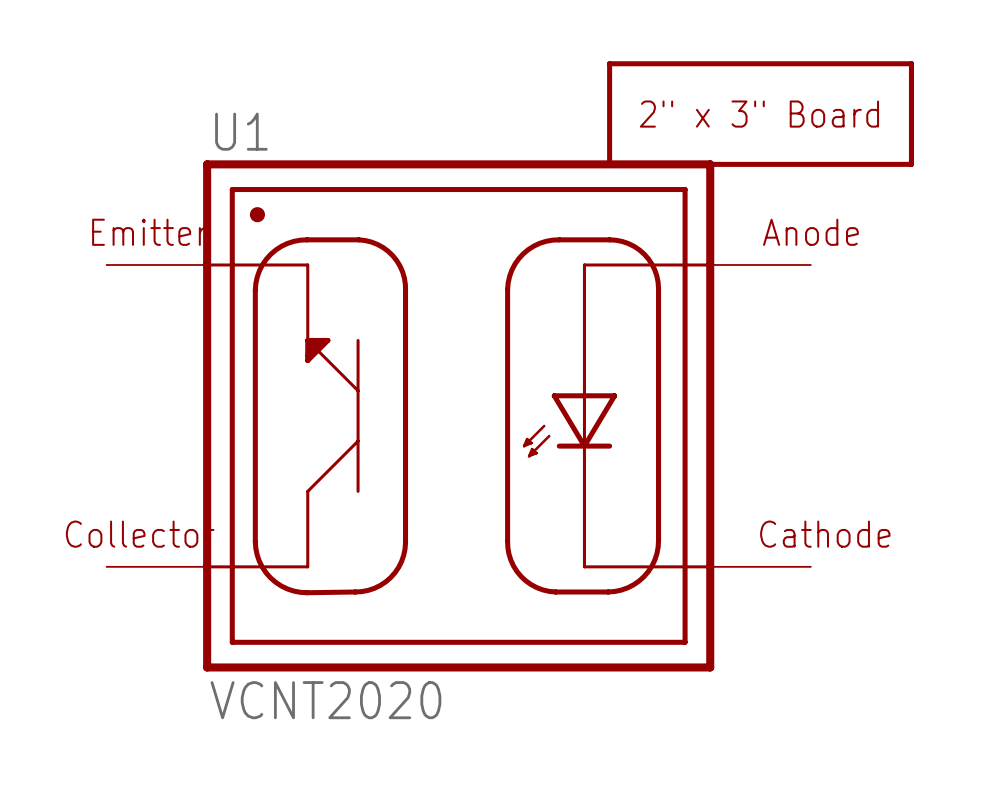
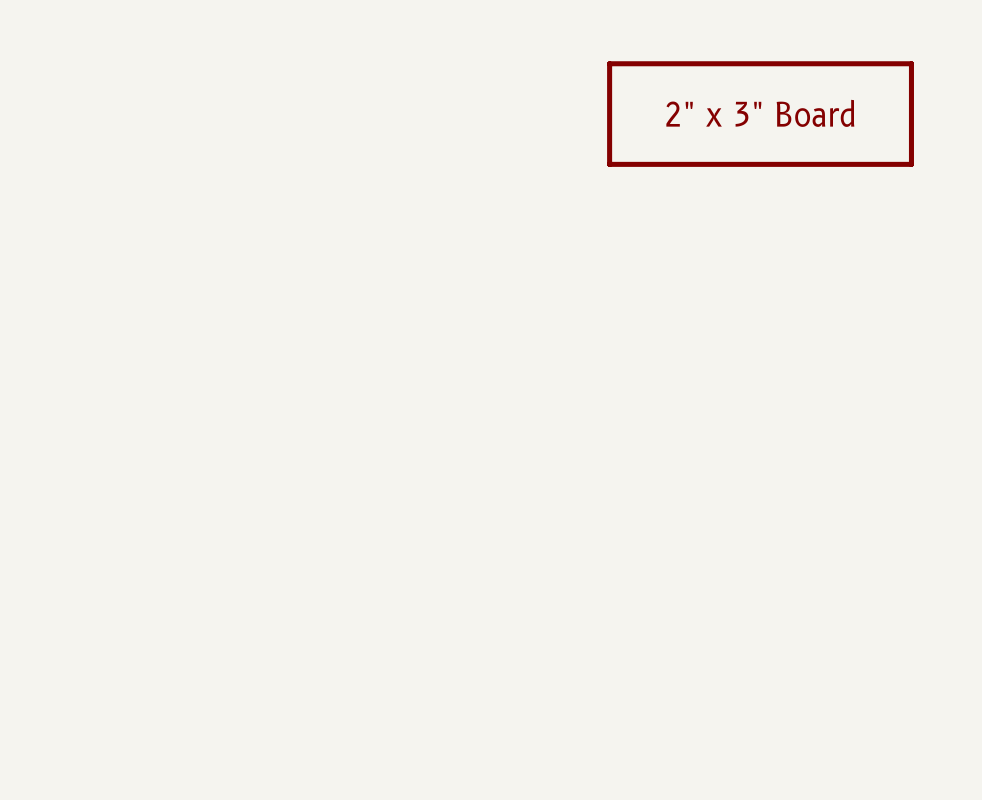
U1: VCNT2020 (458, 415) -> none

